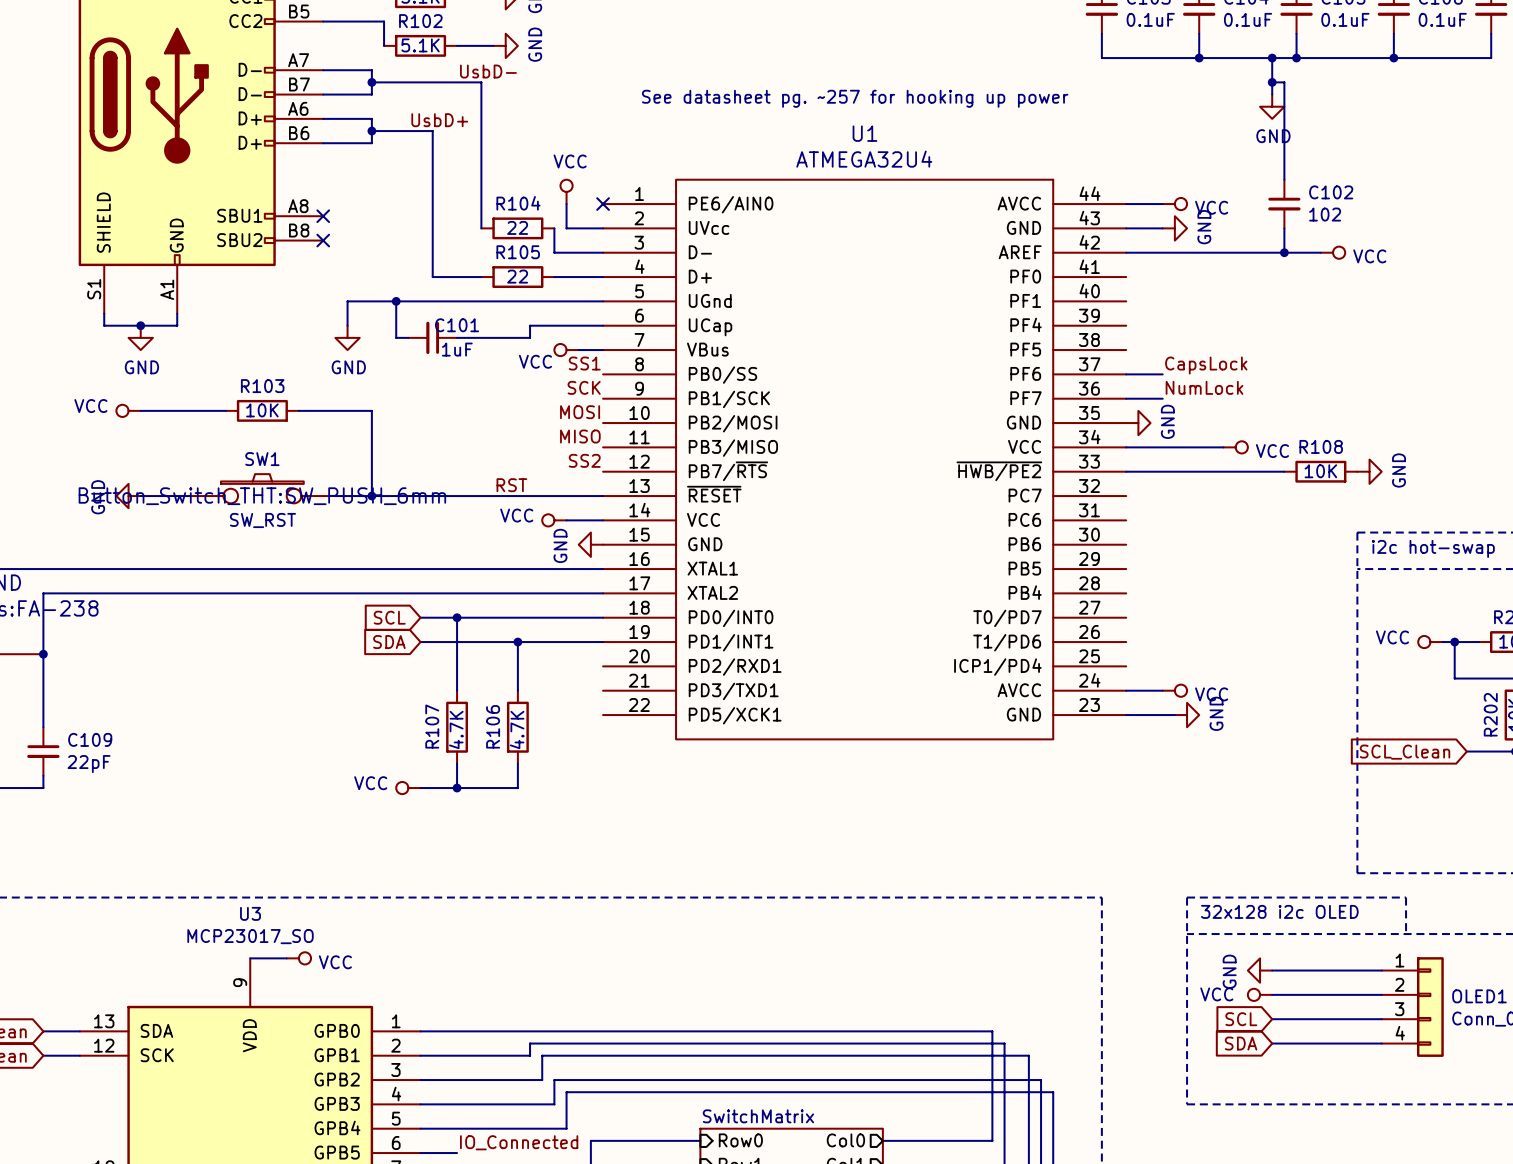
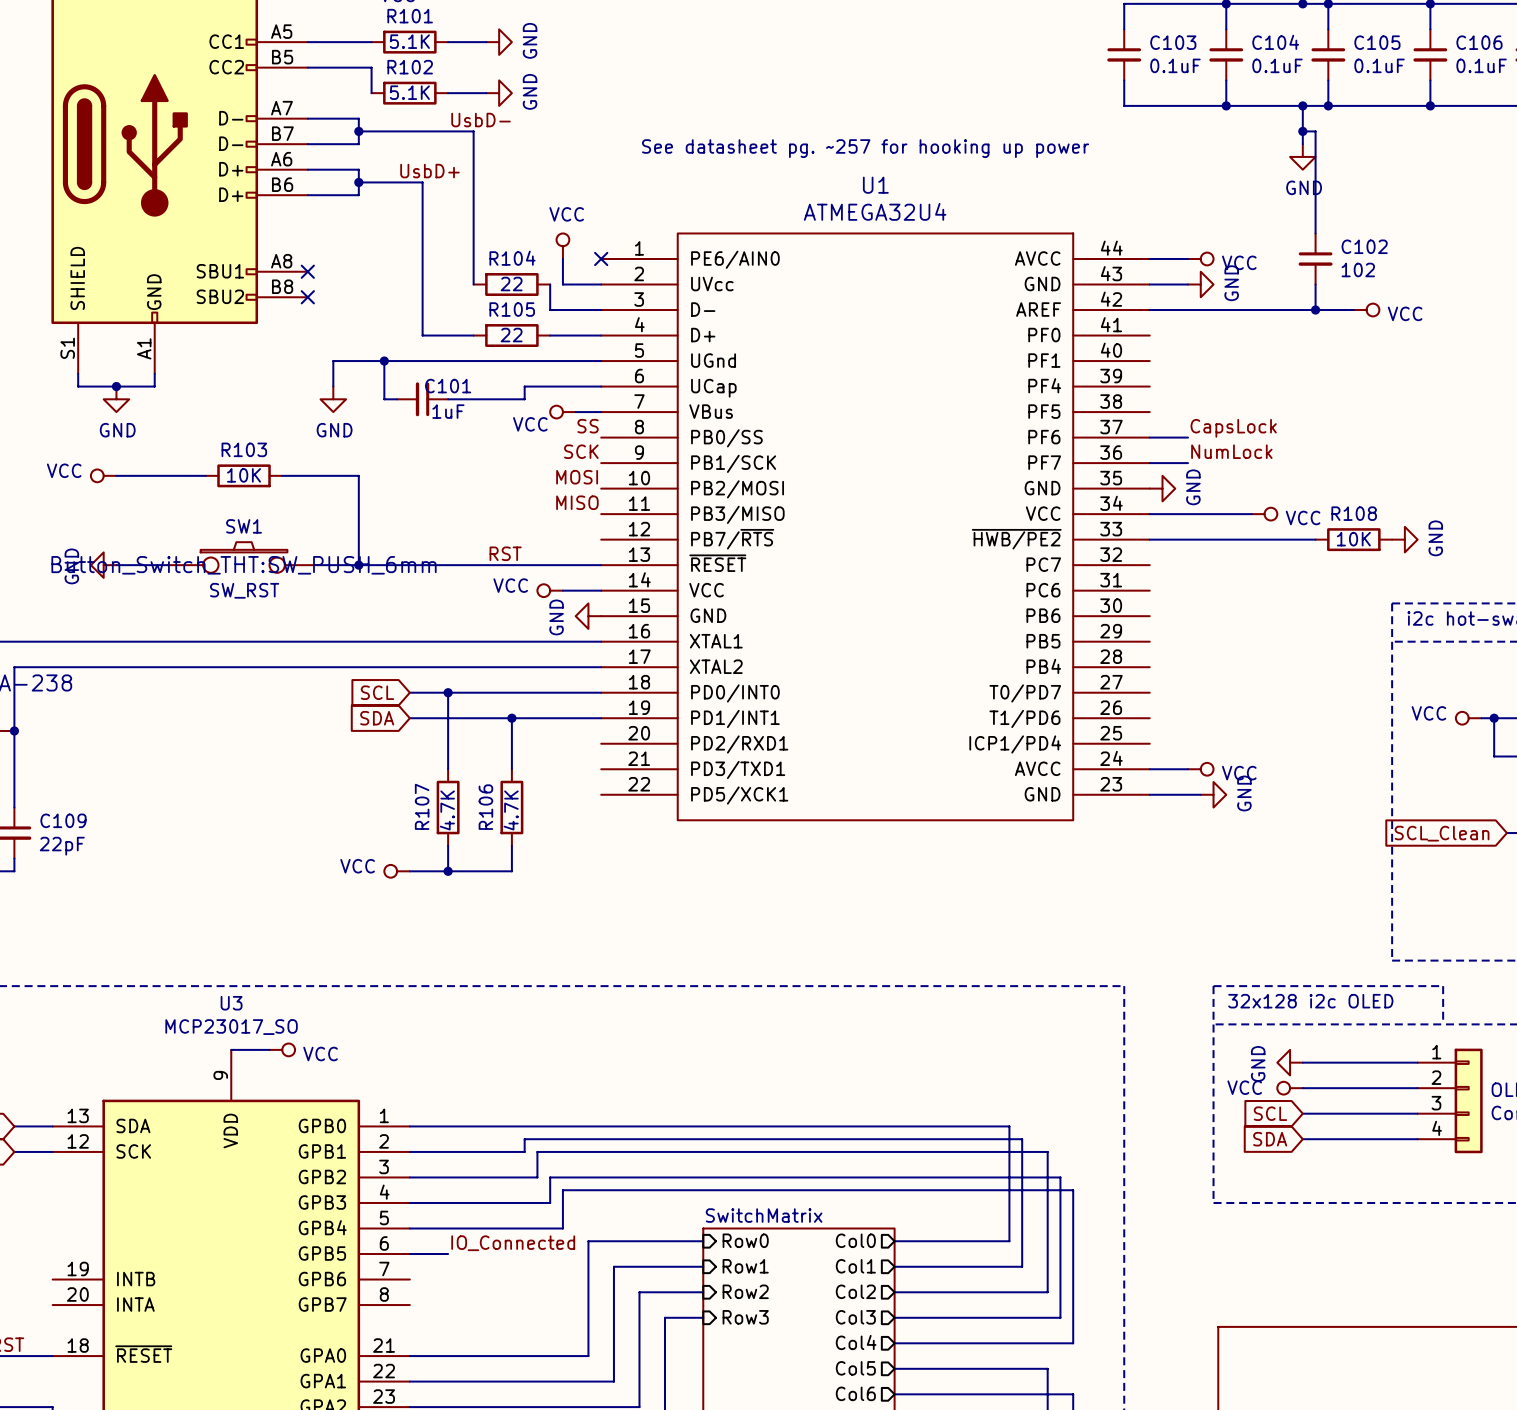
label: SS1 (584, 363) -> SS (588, 426)
label: SS2 (584, 460) -> none

